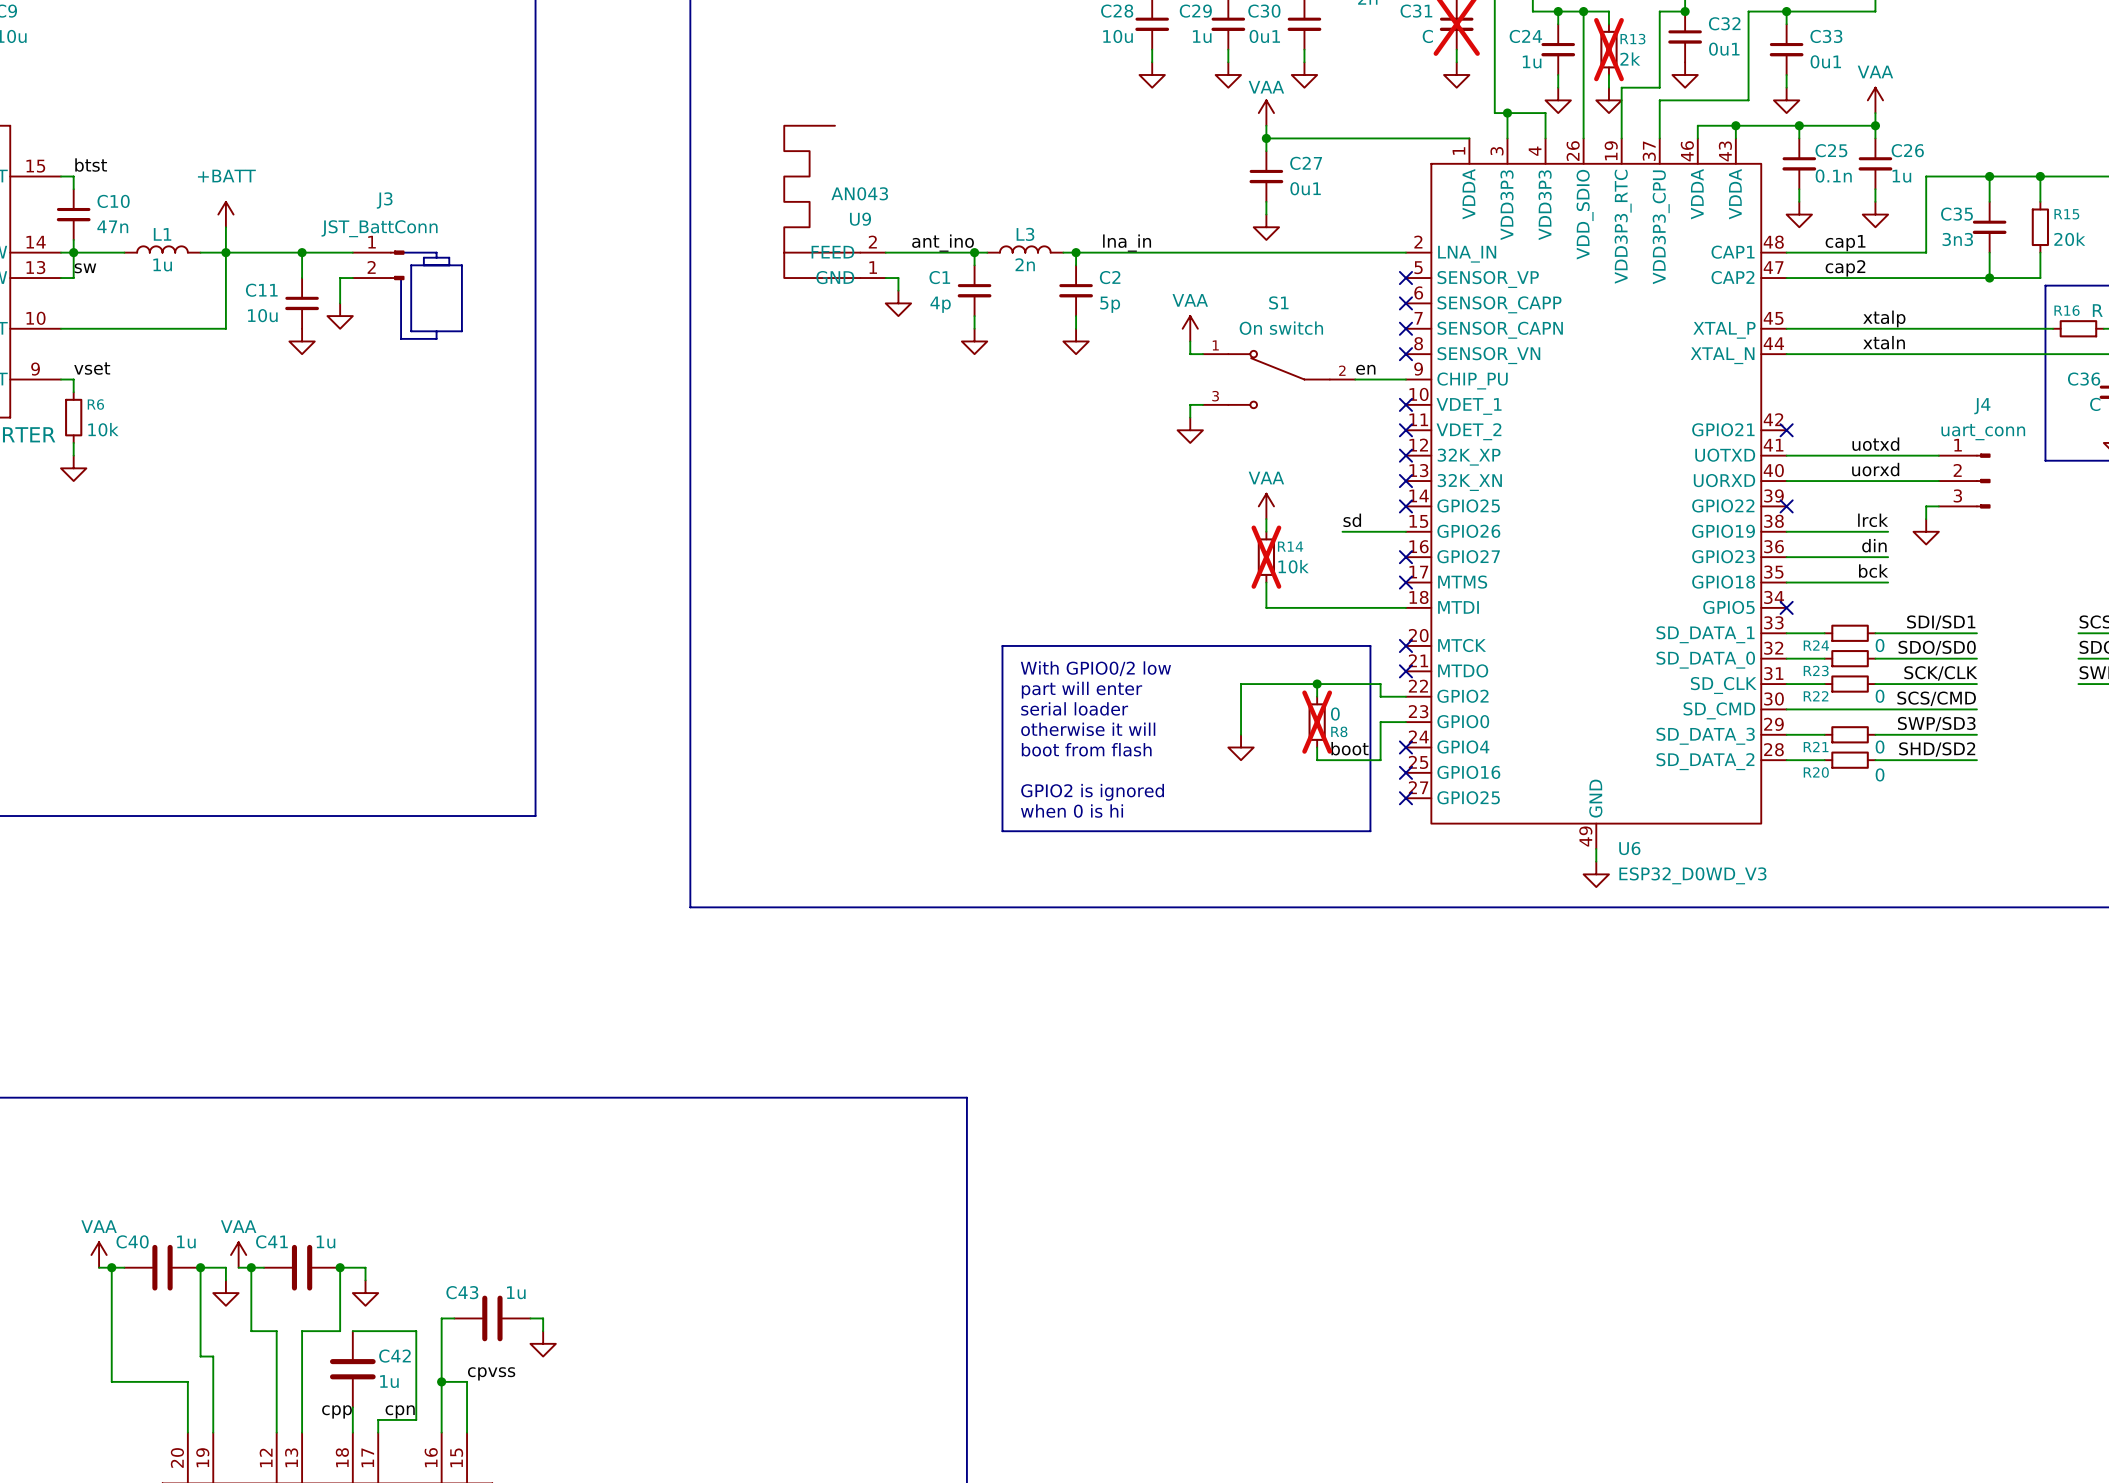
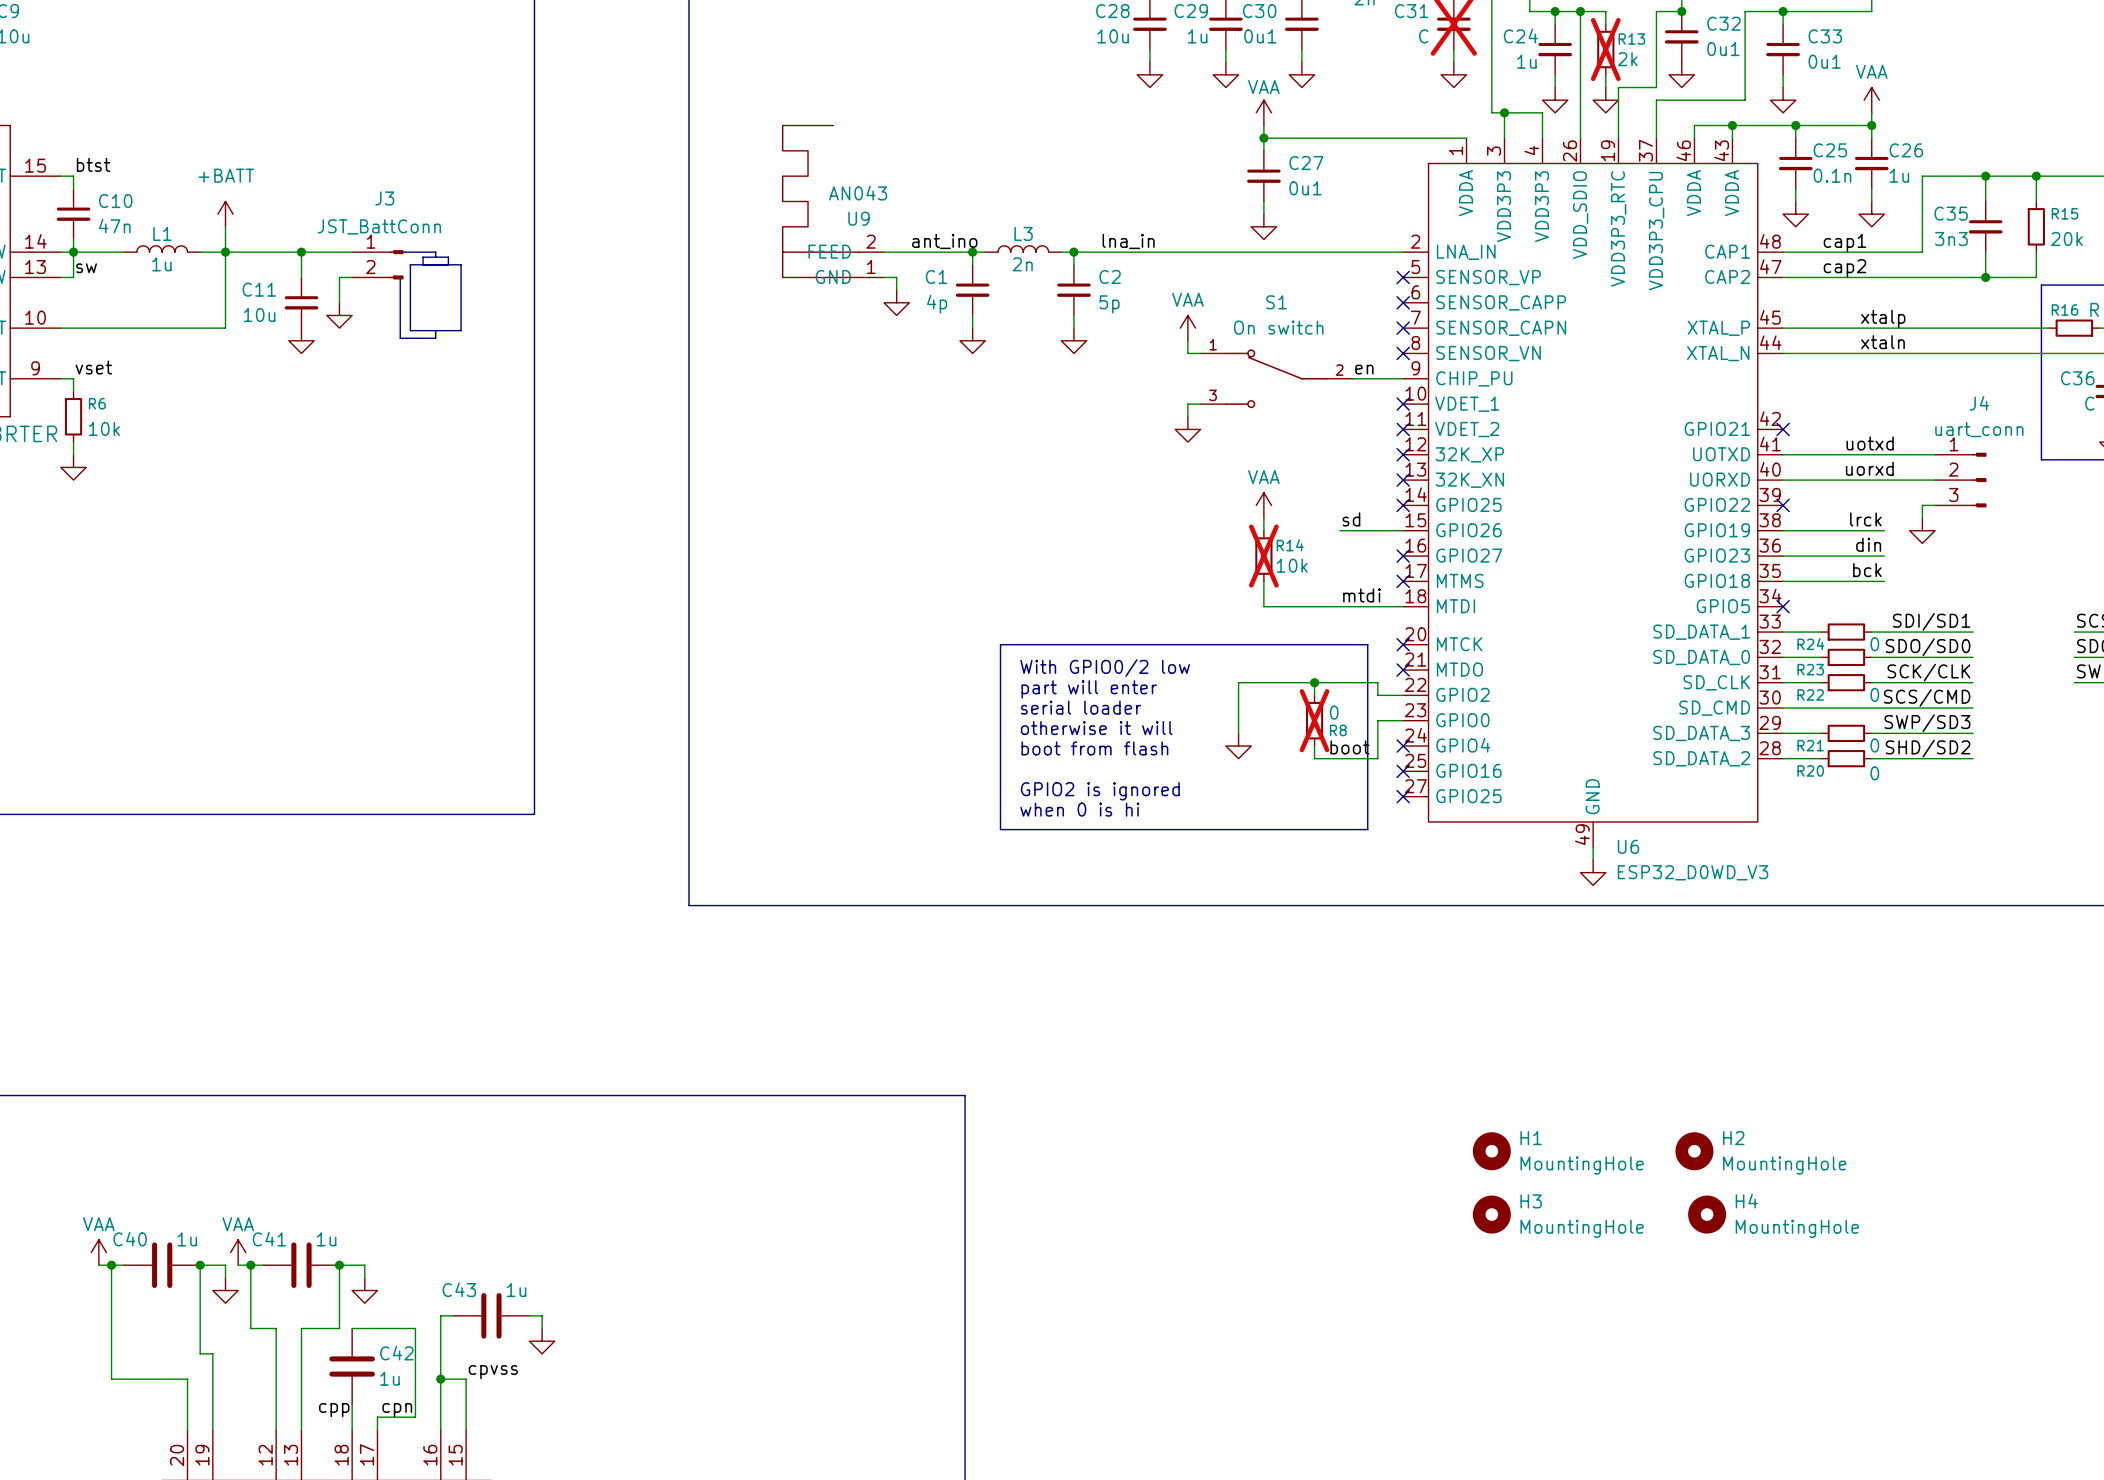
label: none -> mtdi (1361, 595)
H1: none -> MountingHole (1491, 1151)
H2: none -> MountingHole (1694, 1151)
H3: none -> MountingHole (1491, 1214)
H4: none -> MountingHole (1707, 1214)

